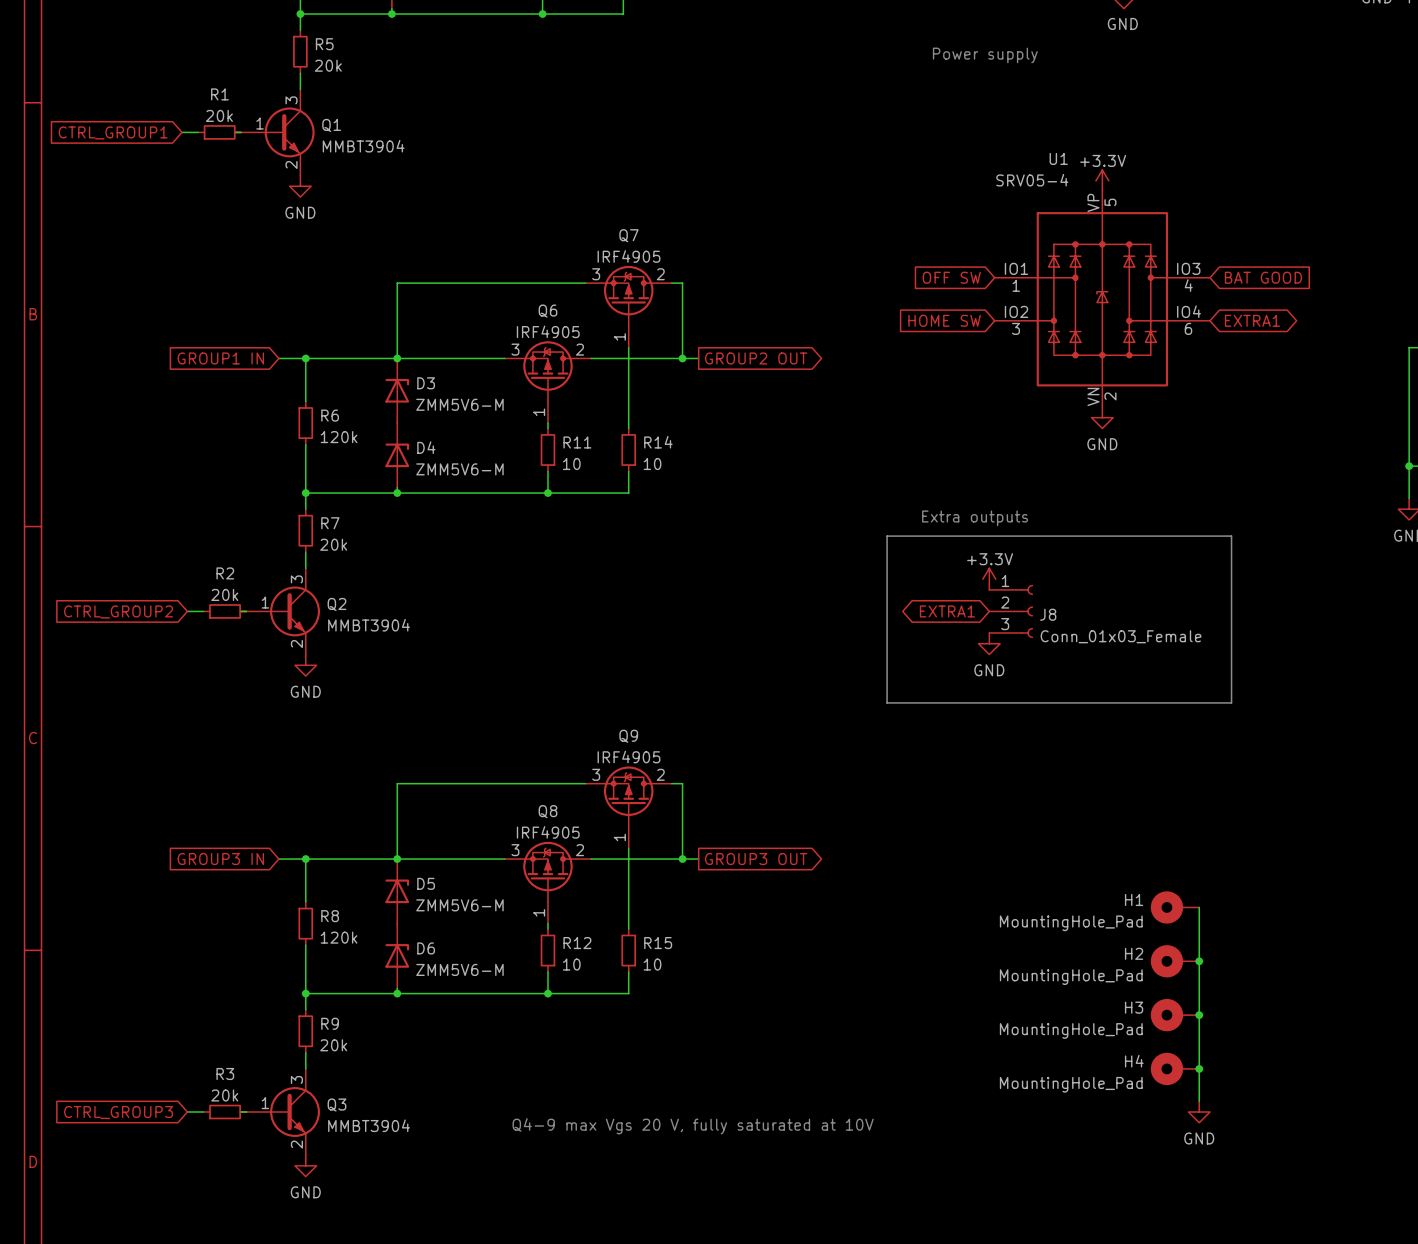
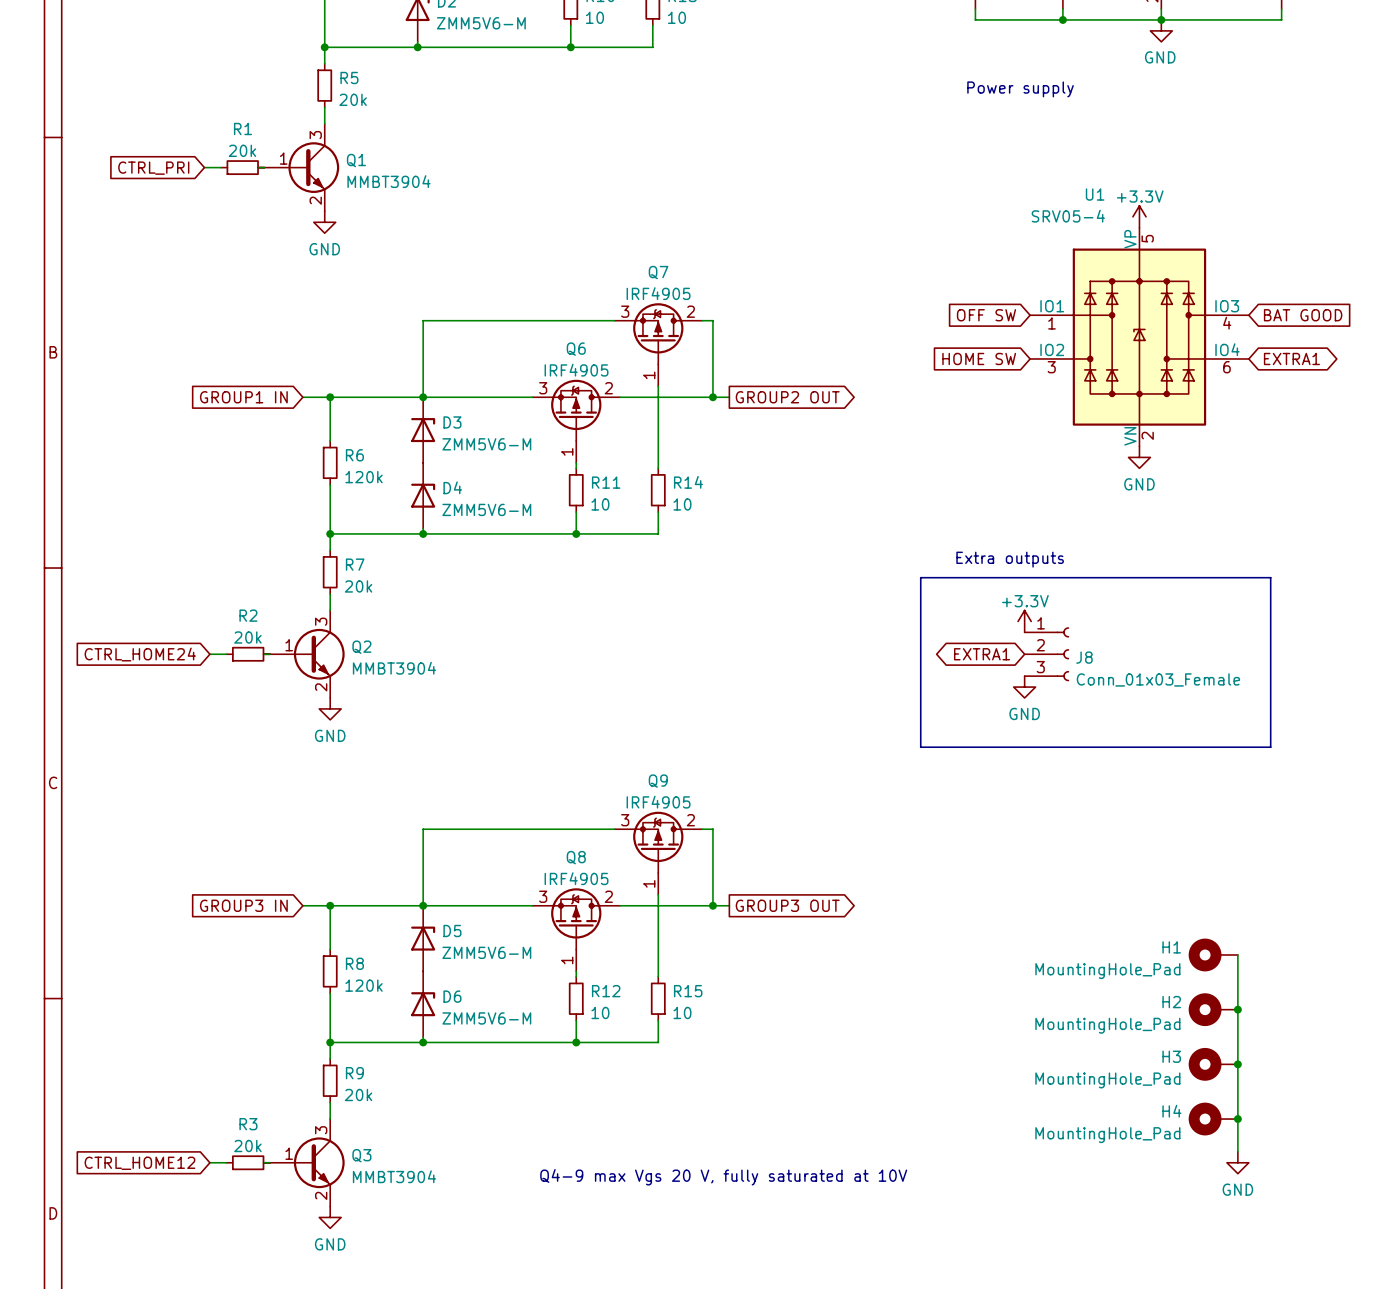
global label: CTRL_GROUP1 (113, 132) -> CTRL_PRI (153, 168)
global label: CTRL_GROUP2 (118, 611) -> CTRL_HOME24 (140, 654)
global label: CTRL_GROUP3 (118, 1112) -> CTRL_HOME12 (139, 1163)

